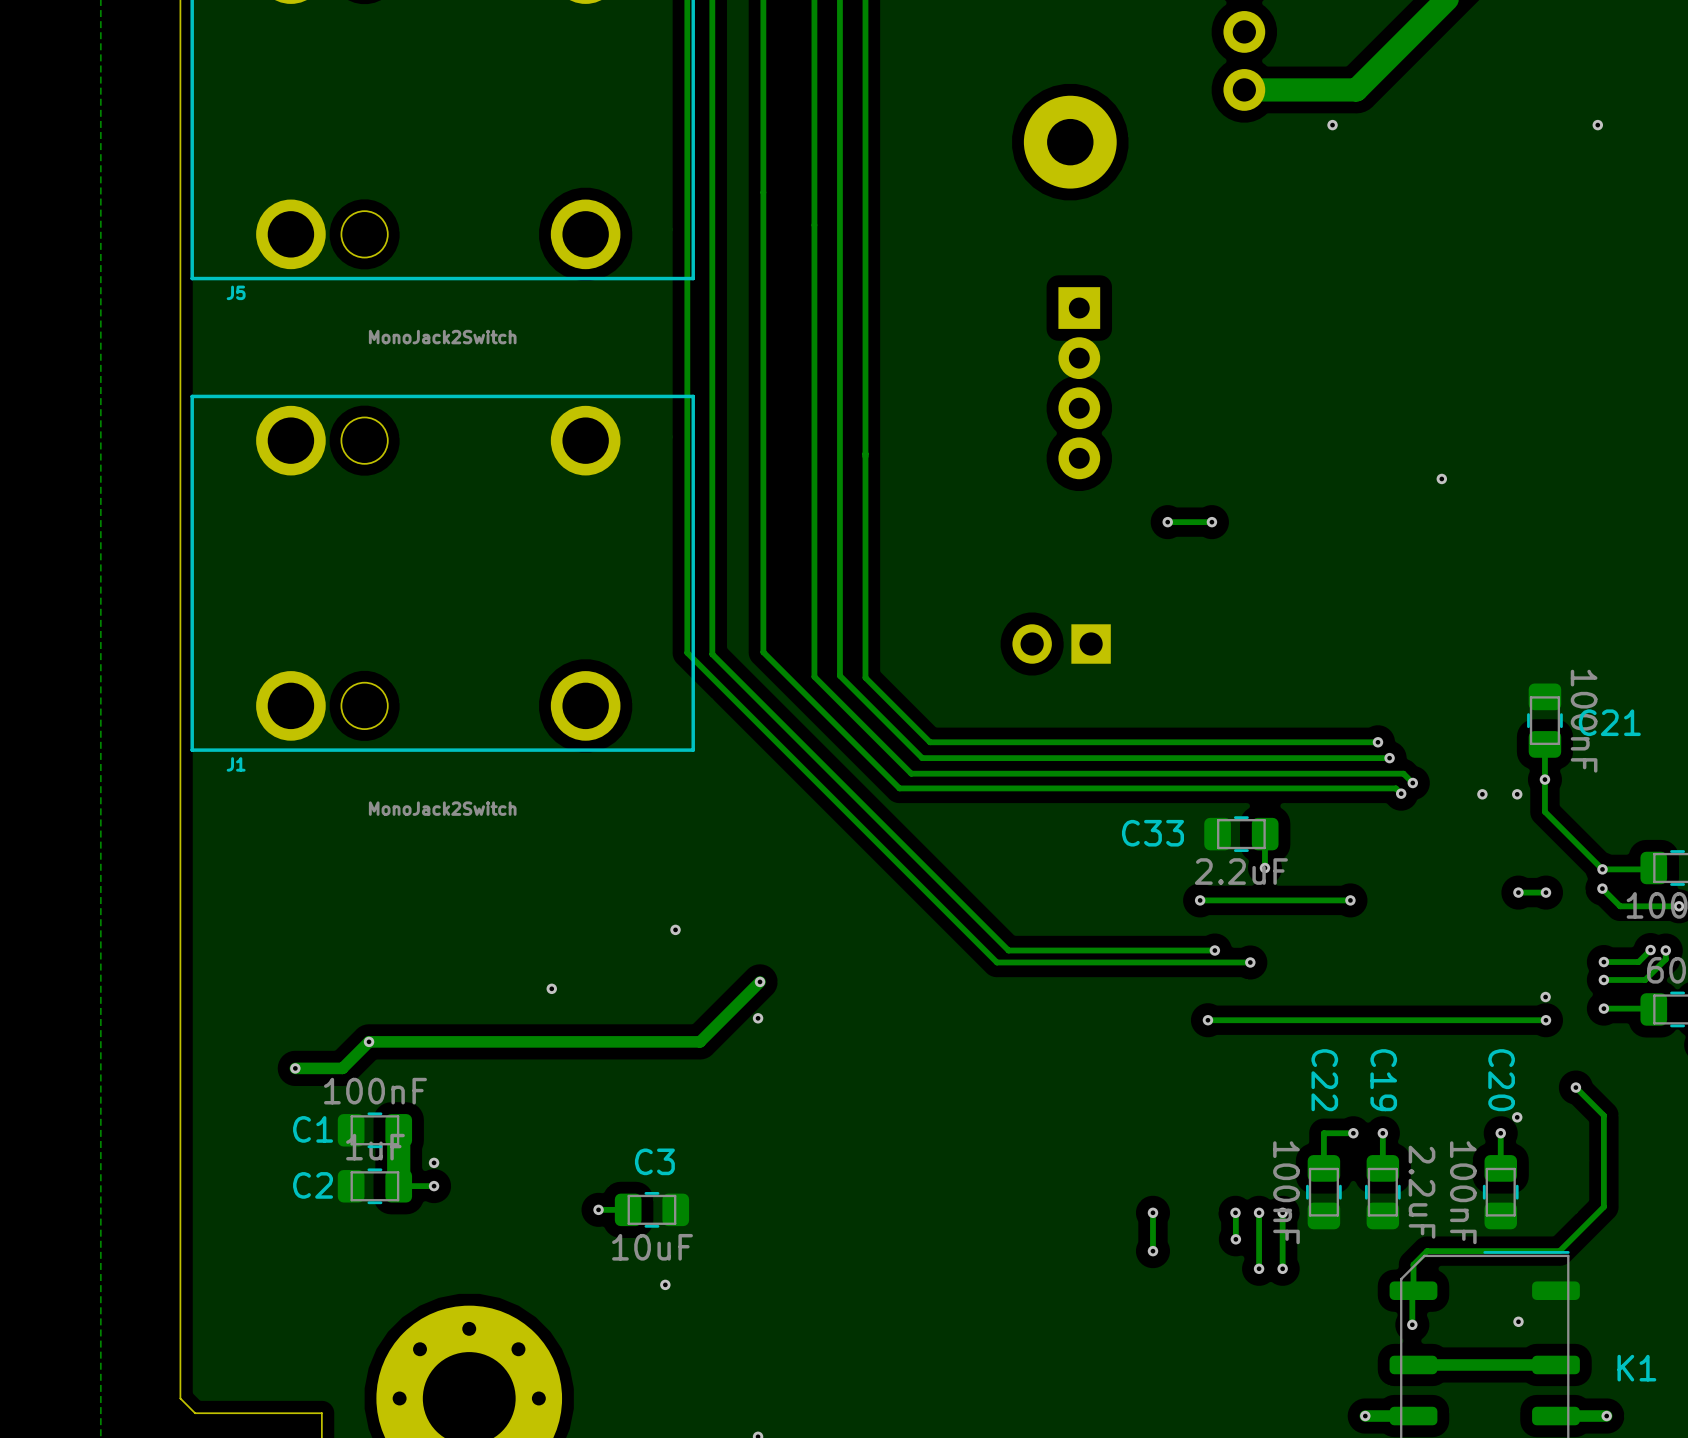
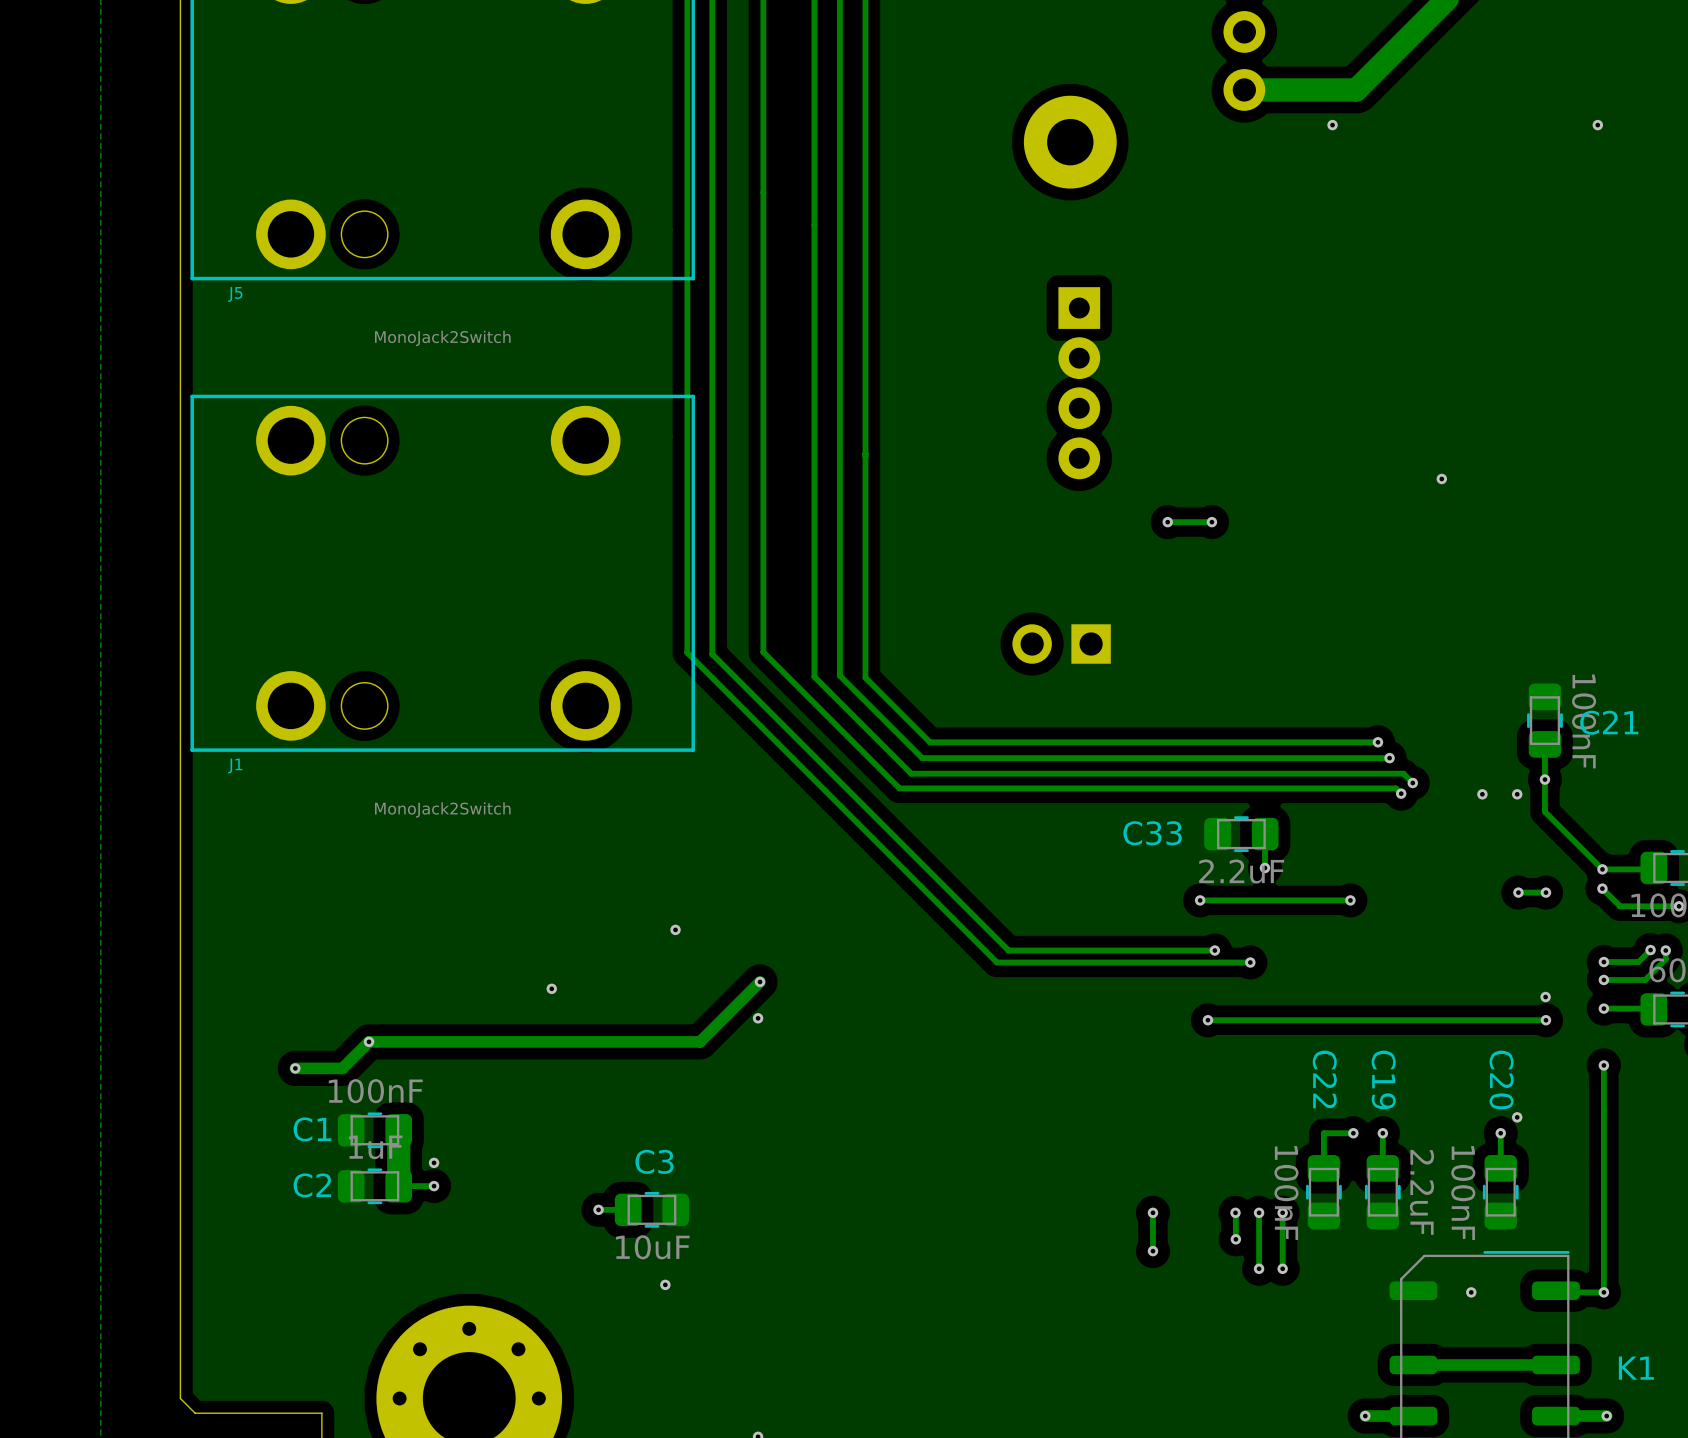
track: (1575, 1087) (1603, 1115) -> (1603, 1065) (1603, 1115)
via position: (1575, 1087) -> (1603, 1065)
track: (1603, 1206) (1559, 1251) (1427, 1251) (1413, 1264) (1412, 1324) -> (1603, 1206) (1603, 1292) (1557, 1292) (1555, 1290)
via: none -> (1471, 1292)
via: none -> (1603, 1292)
via: (1518, 1321) -> none
via: (1412, 1324) -> none

